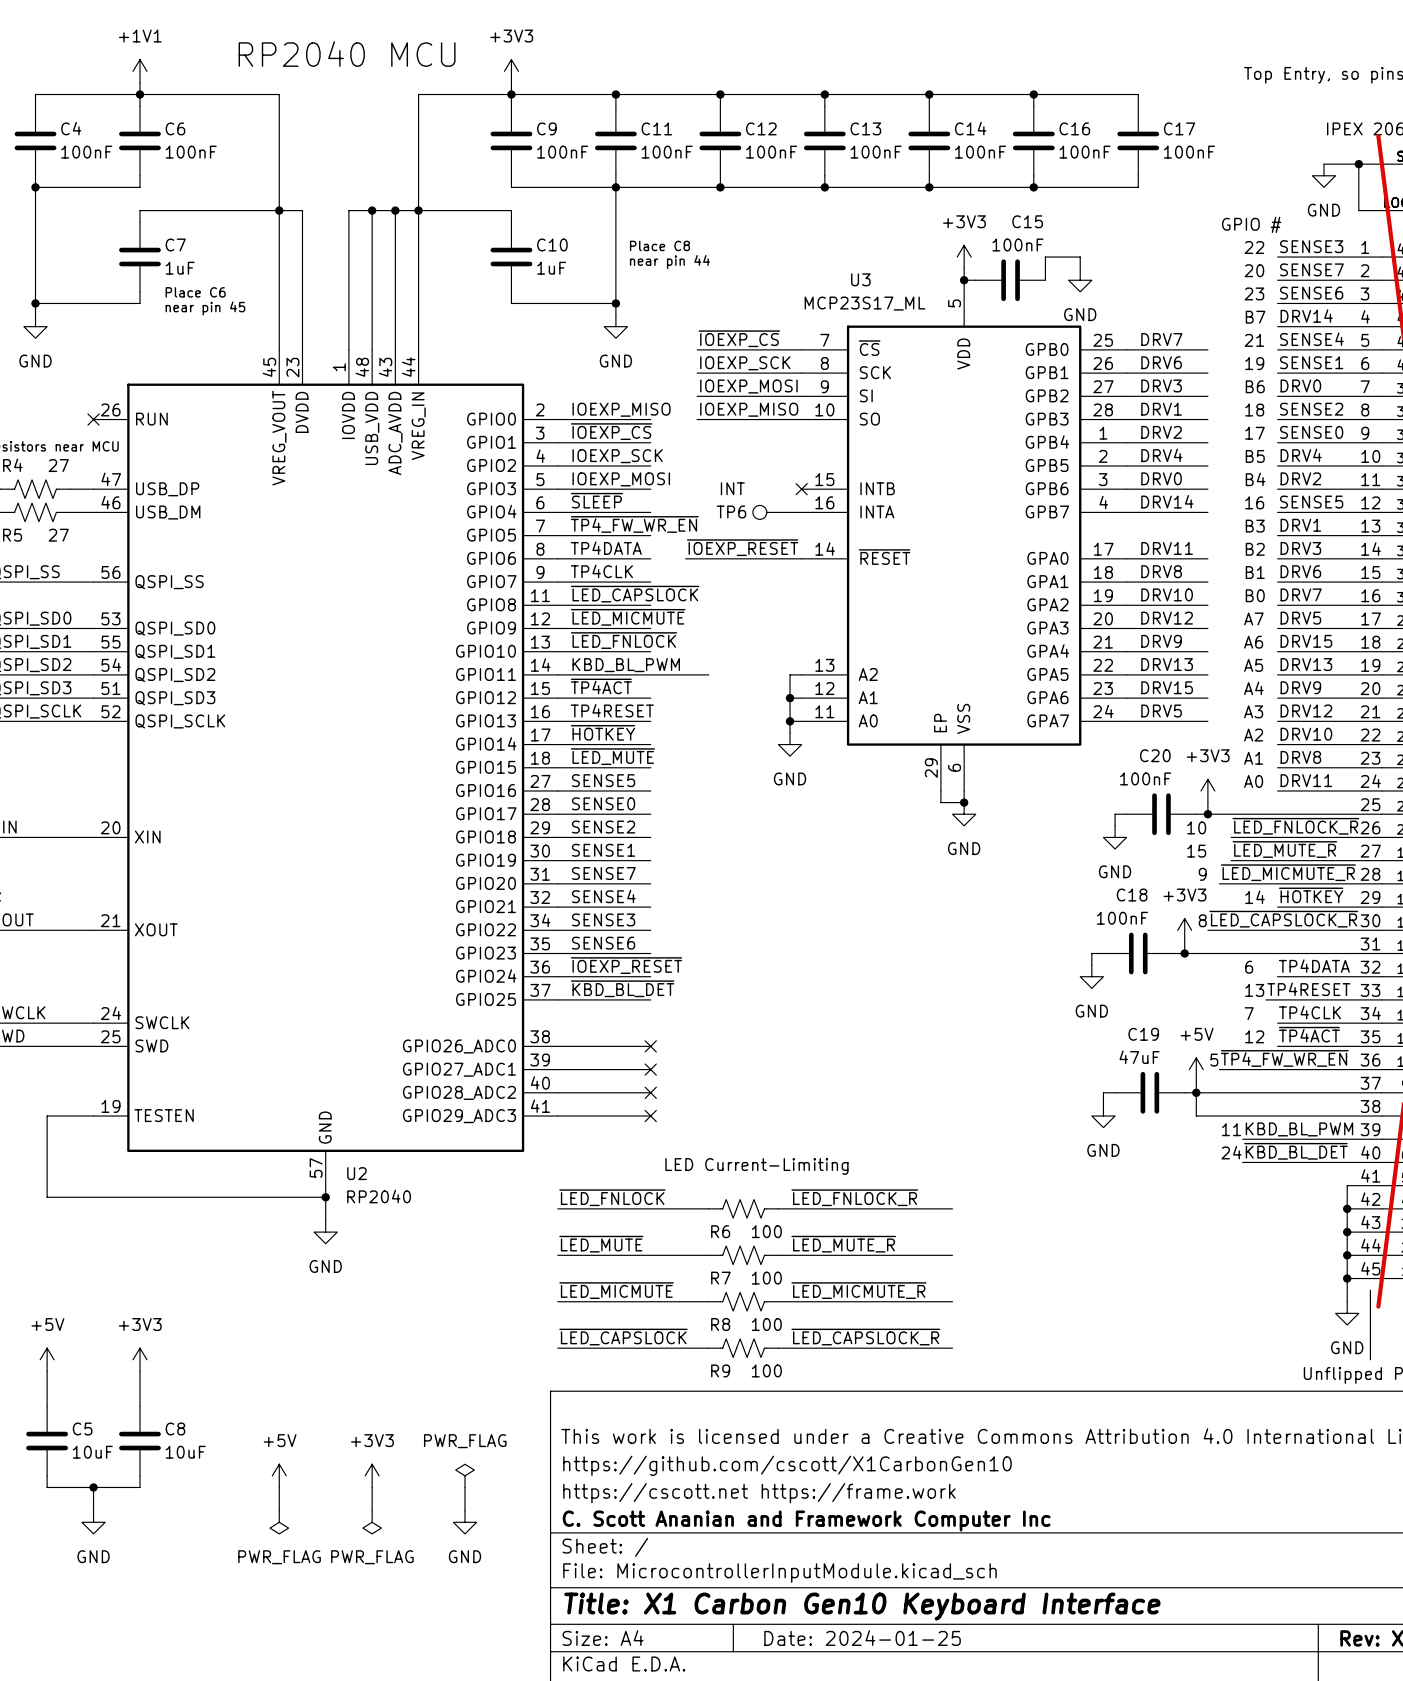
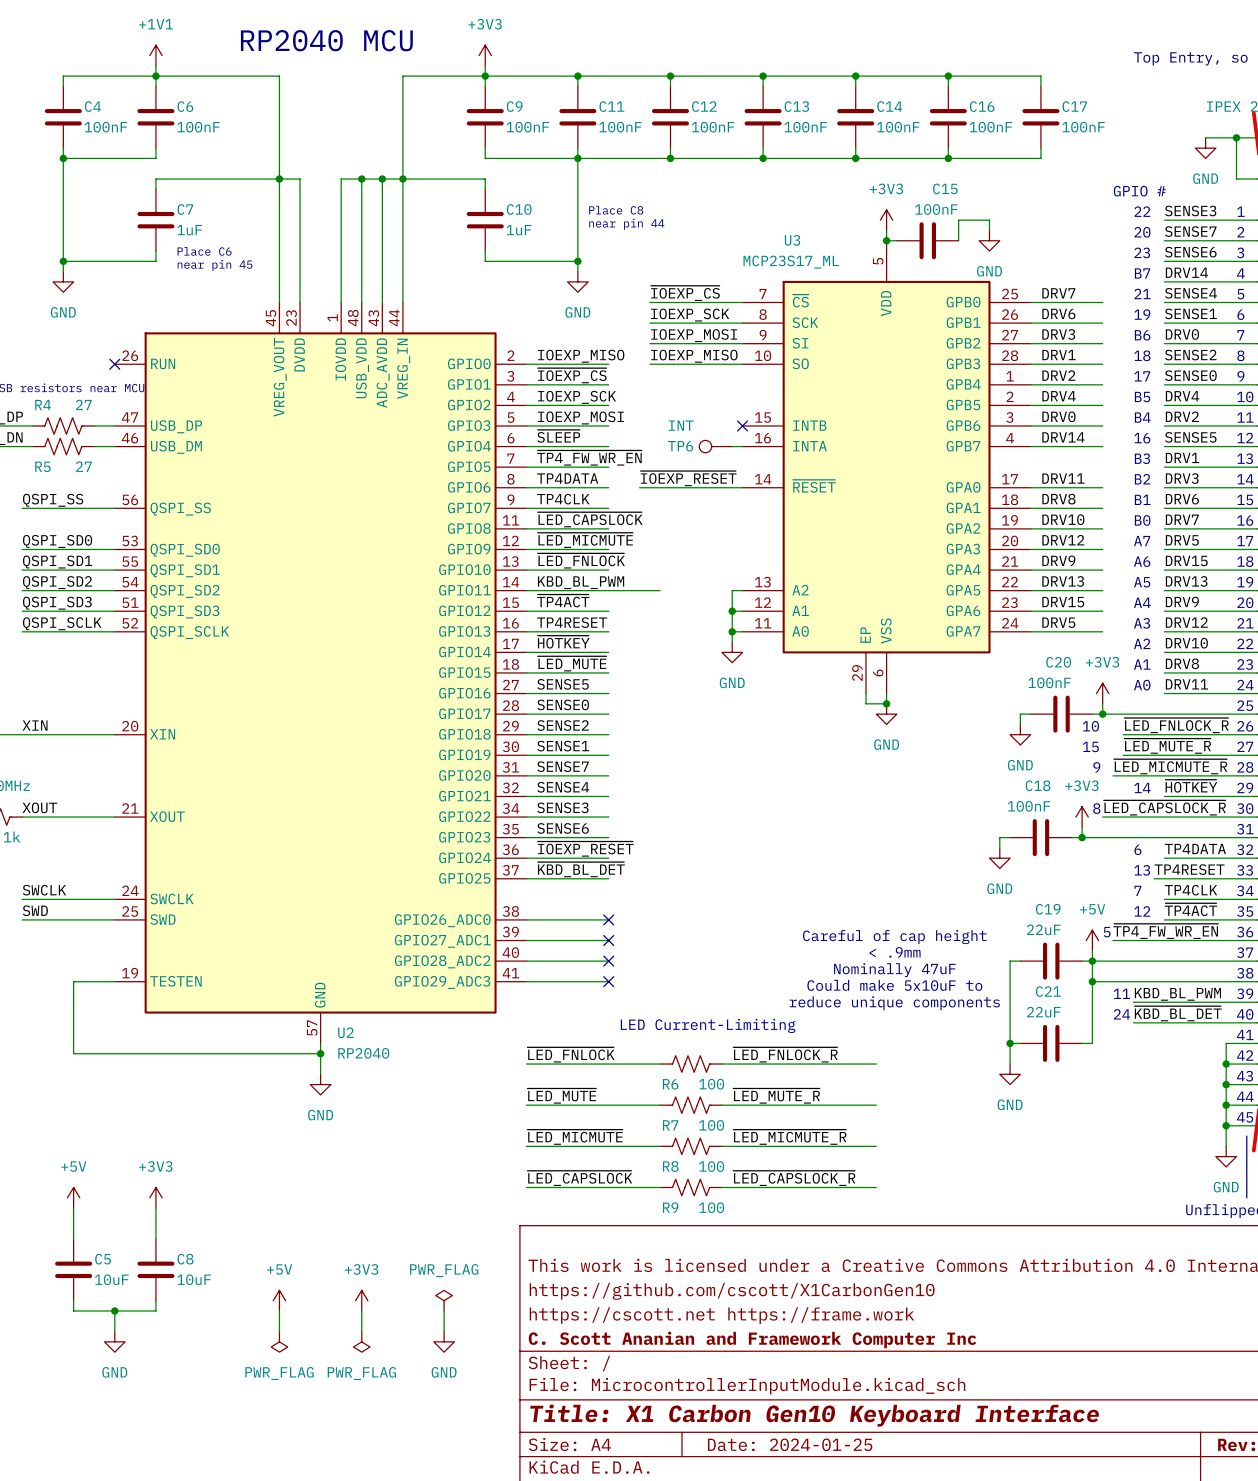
C19 value: 47uF (1139, 1057) -> 22uF (1043, 929)
text: none -> Careful of cap height (894, 937)
text: none -> < .9mm (895, 952)
text: none -> Nominally 47uF (894, 970)
wire: none -> (1010, 971) (1010, 1064)
power symbol position: GND (1103, 1116) -> GND (1010, 1074)
wire: none -> (1092, 981) (1092, 1043) (1082, 1043)
junction: none -> (1092, 981)
text: none -> Could make 5x10uF to (894, 985)
text: none -> reduce unique components (894, 1003)
wire: none -> (1010, 1043) (1020, 1043)
junction: none -> (1010, 1043)
C21: none -> 22uF (1051, 1043)

